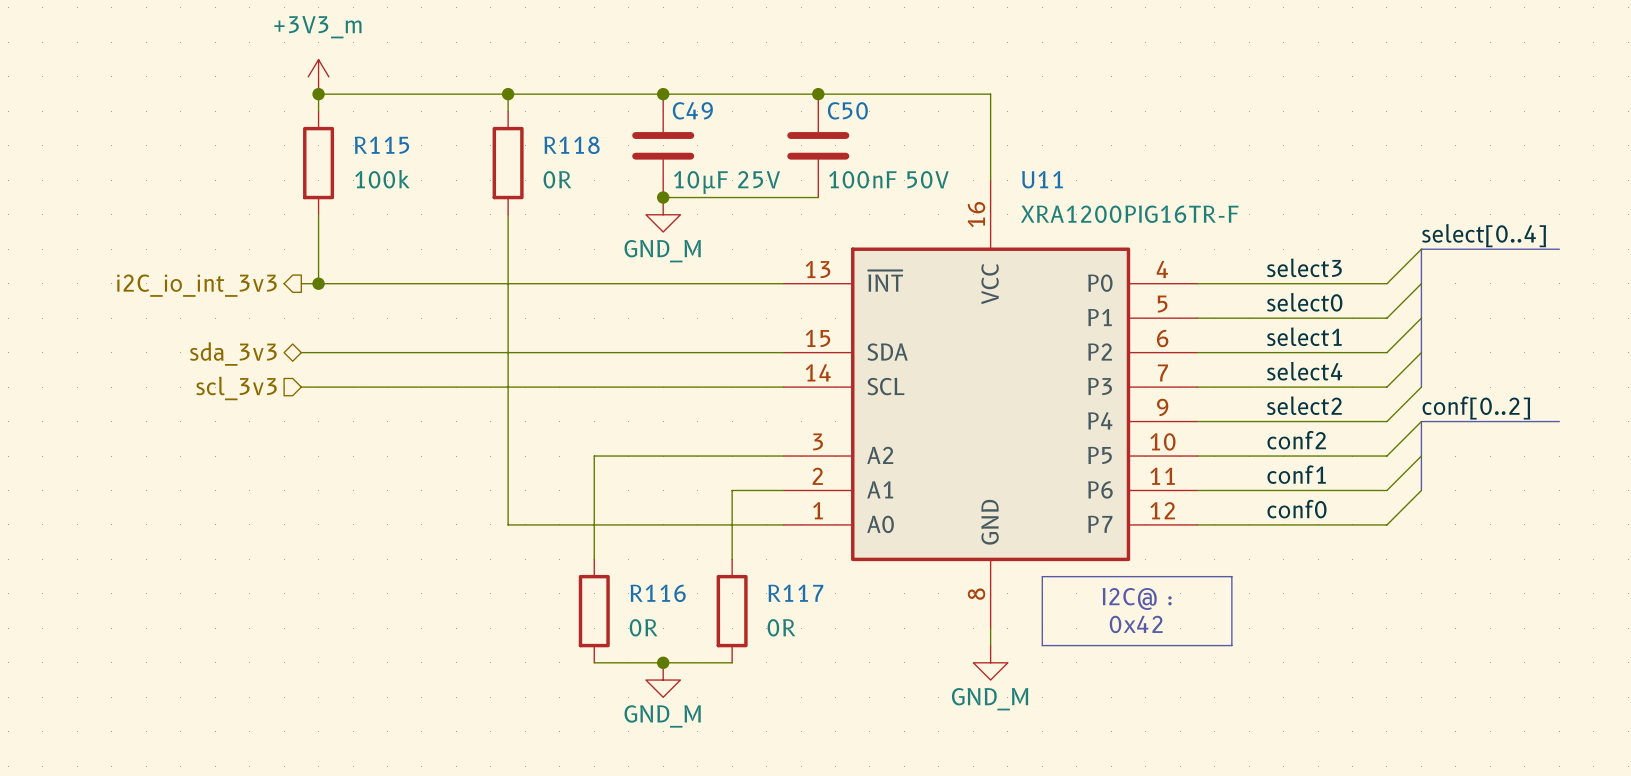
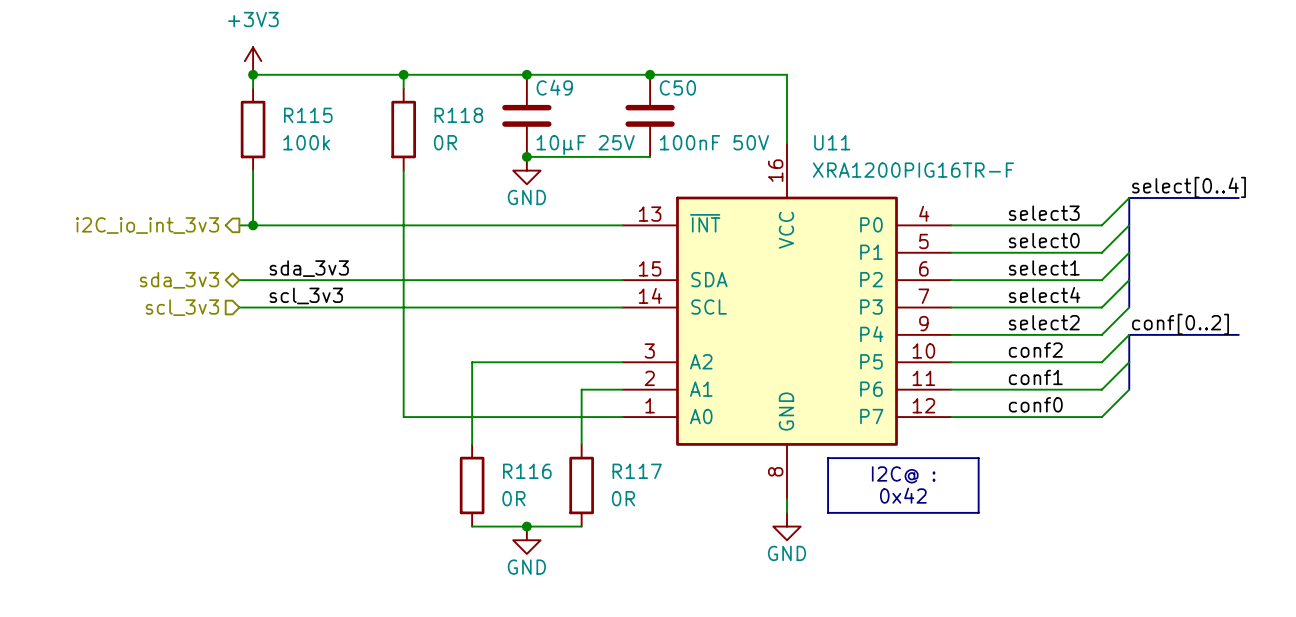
power symbol: +3V3_m (318, 76) -> +3V3 (253, 61)
power symbol: GND_M (663, 214) -> GND (526, 170)
label: none -> sda_3v3 (309, 268)
label: none -> scl_3v3 (306, 295)
power symbol: GND_M (990, 662) -> GND (786, 526)
power symbol: GND_M (663, 680) -> GND (526, 540)

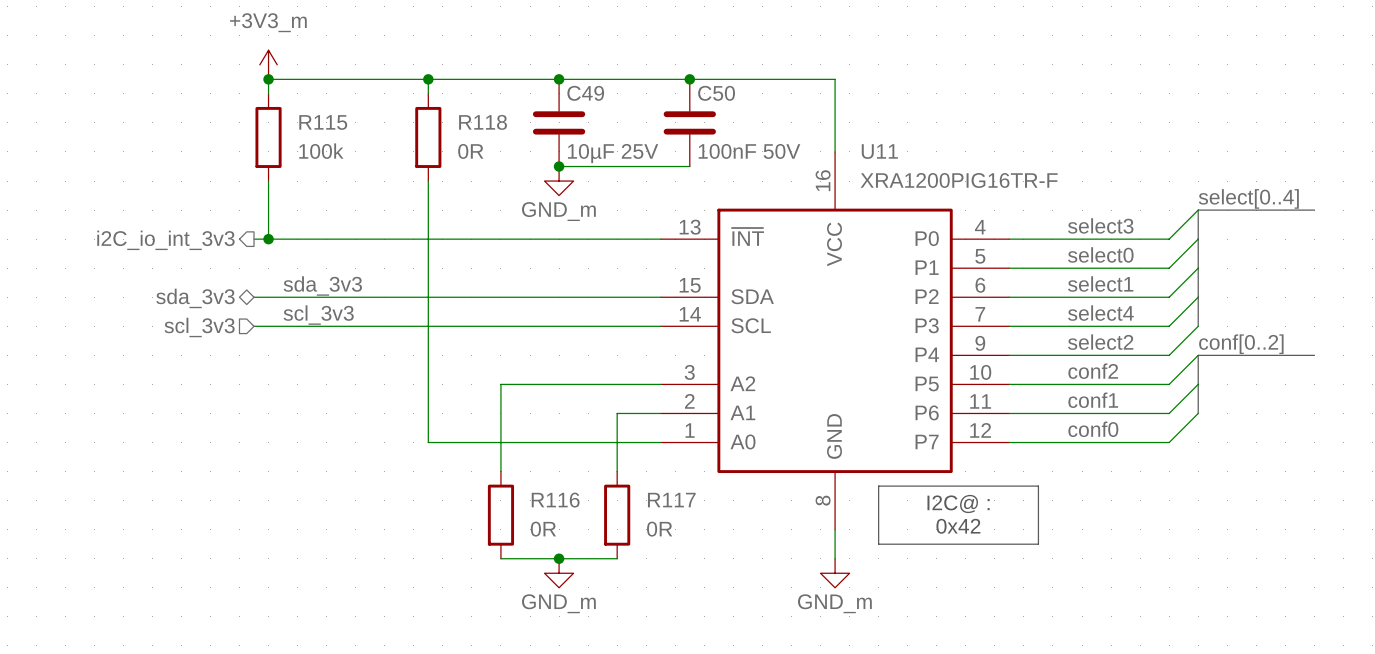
power symbol: +3V3 (253, 61) -> +3V3_m (268, 64)
power symbol: GND (526, 170) -> GND_m (559, 181)
power symbol: GND (786, 526) -> none
power symbol: GND (526, 540) -> GND_m (559, 573)
power symbol: none -> GND_m (835, 573)

